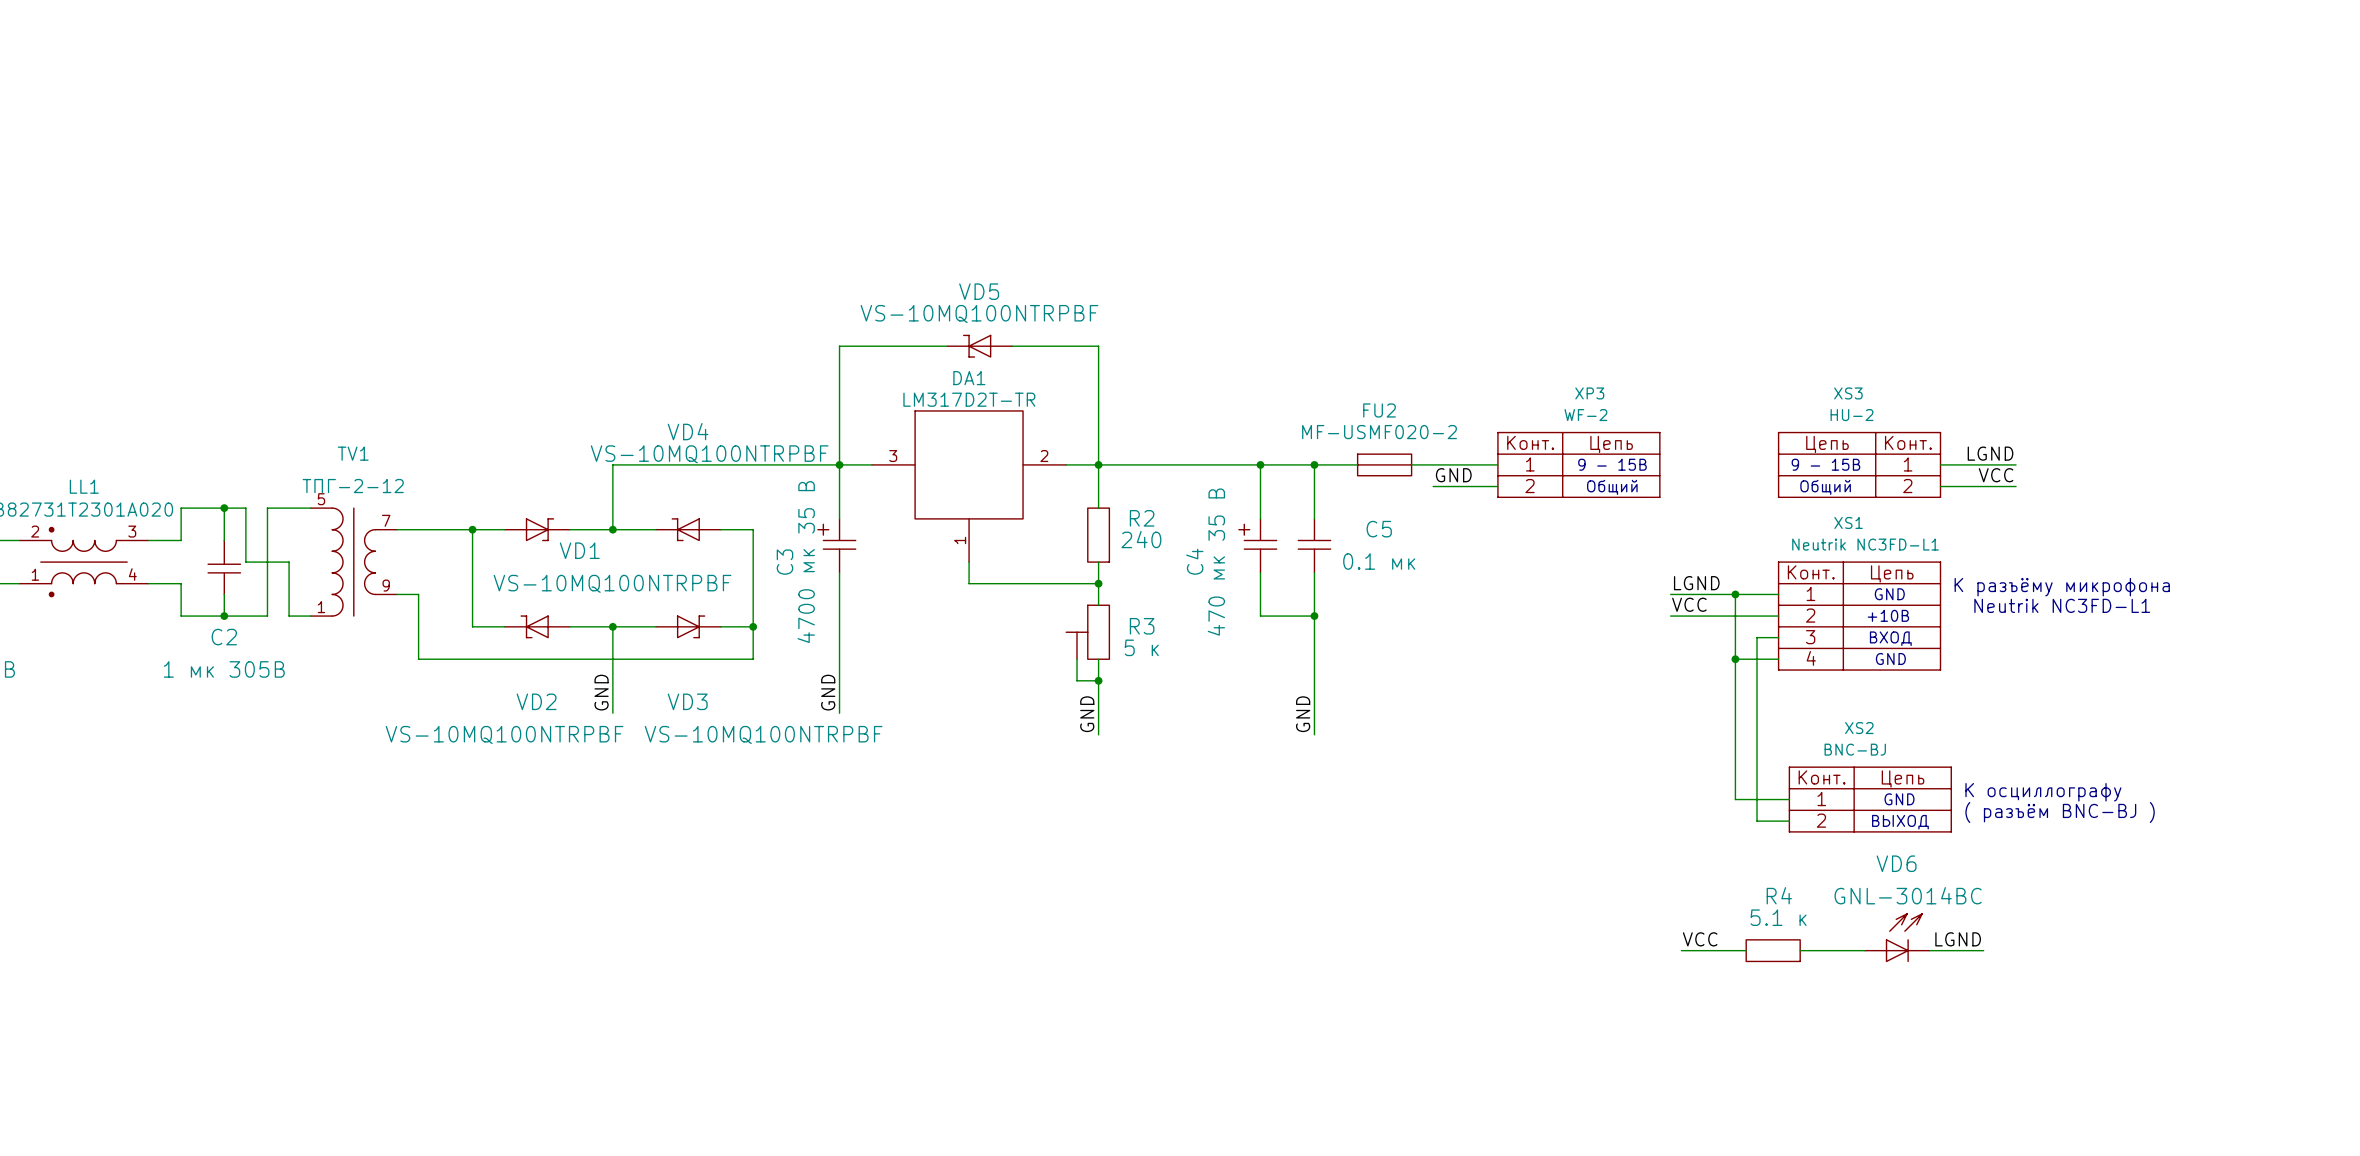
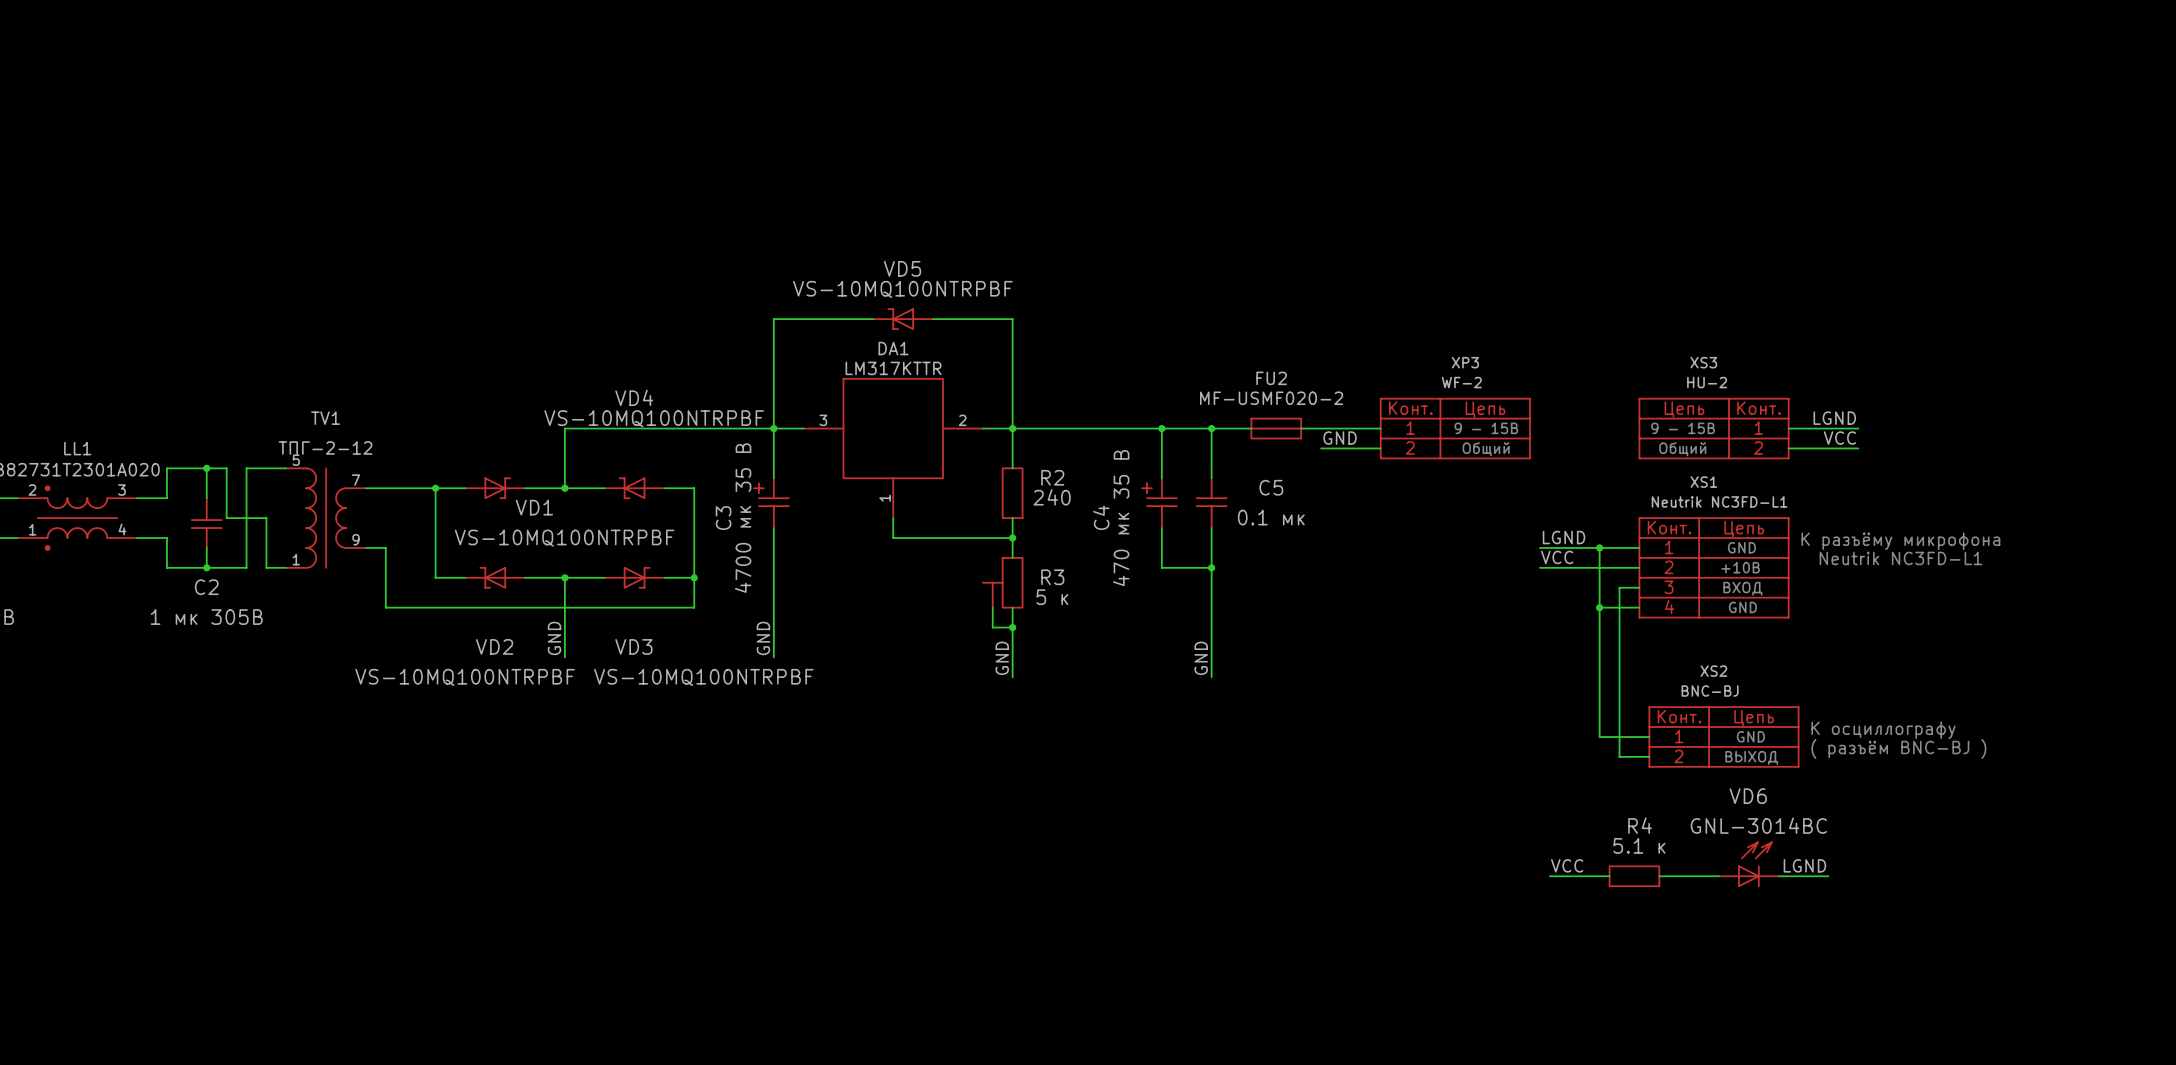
DA1 value: LM317D2T-TR (969, 399) -> LM317KTTR (893, 368)

